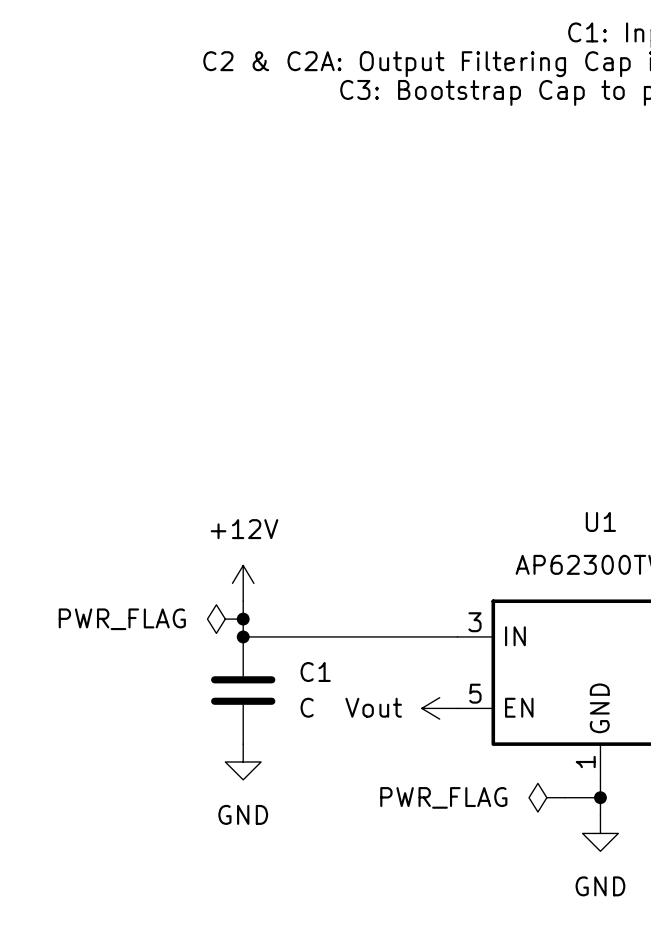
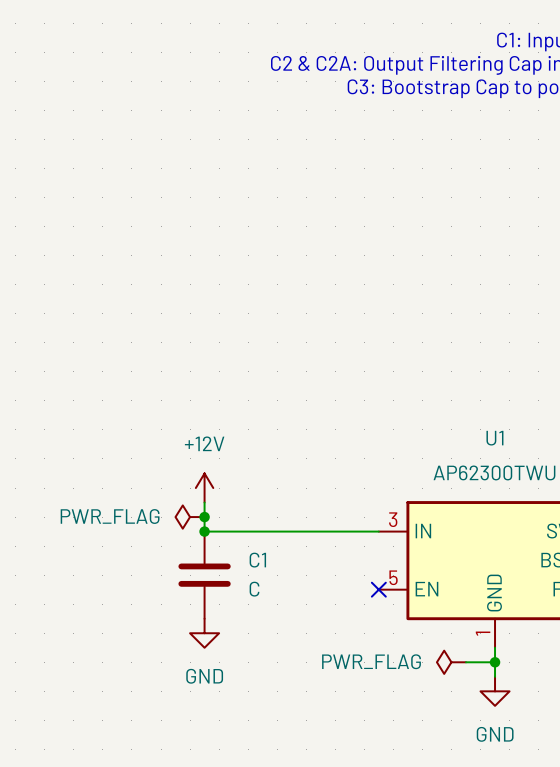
power symbol: Vout (439, 708) -> none
no-connect mark: none -> (378, 589)

